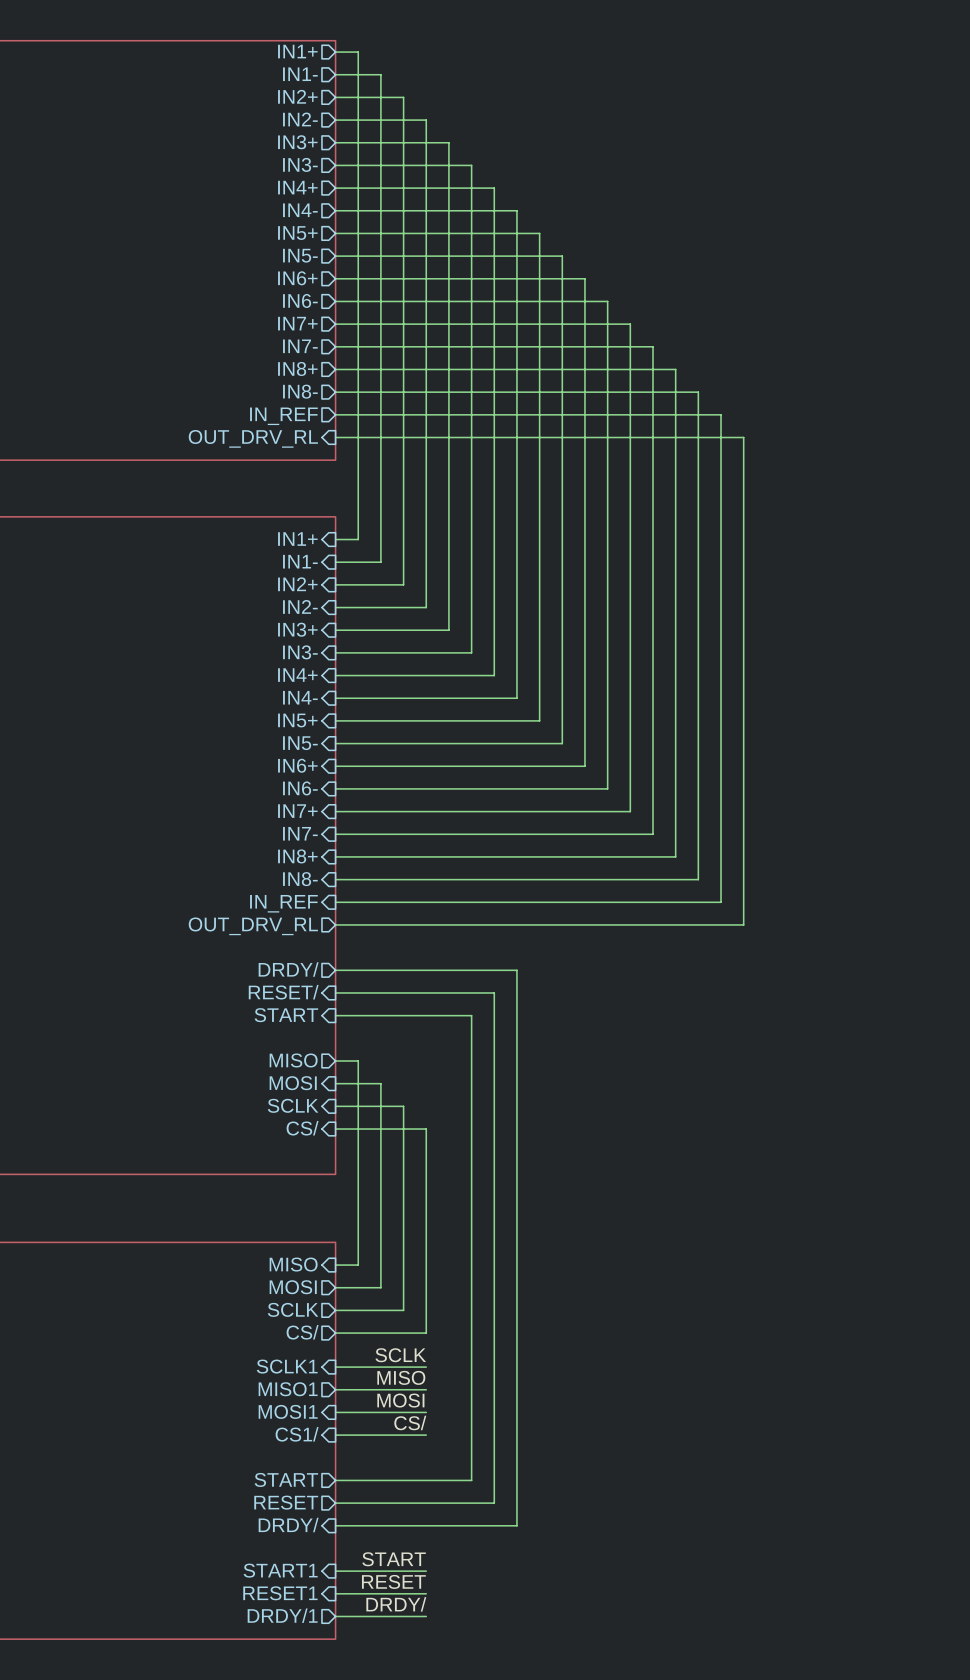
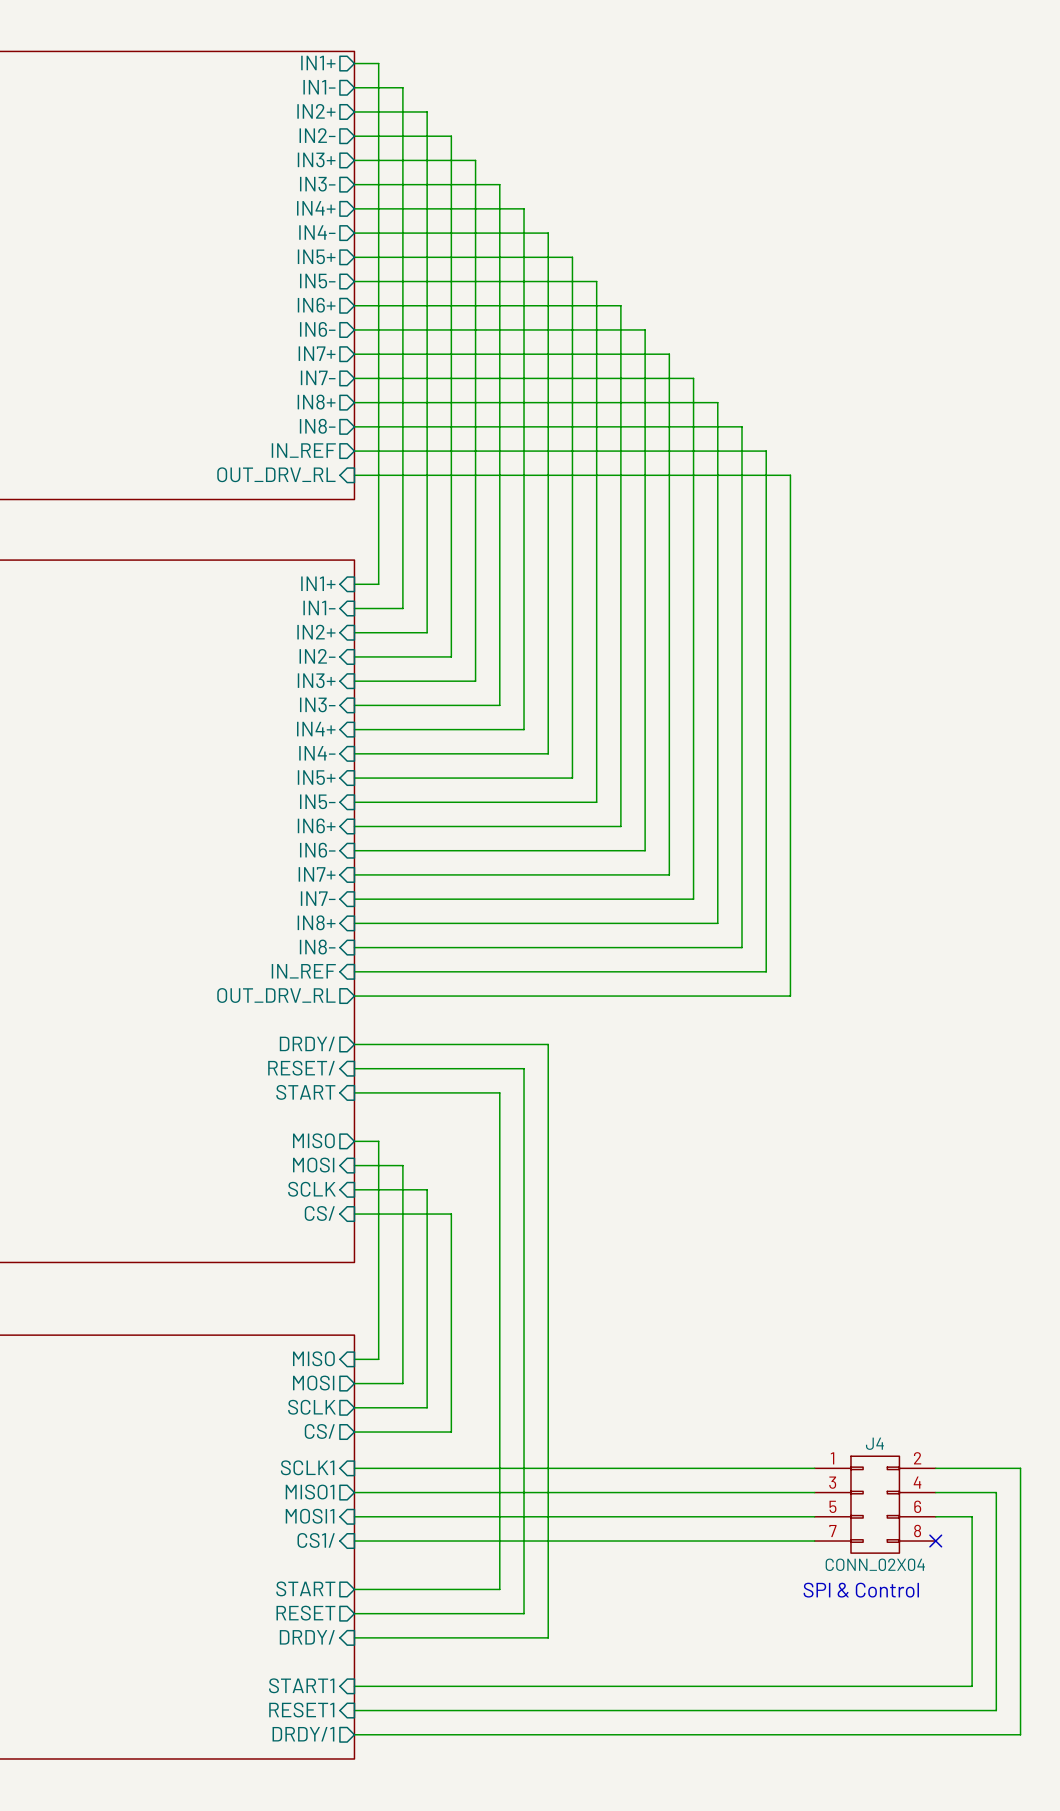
label: SCLK (400, 1355) -> none
wire: none -> (451, 1468) (814, 1468)
wire: none -> (935, 1468) (1020, 1468) (1020, 1734) (451, 1734)
label: MISO (401, 1377) -> none
wire: none -> (451, 1492) (814, 1492)
wire: none -> (935, 1492) (996, 1492) (996, 1710) (451, 1710)
label: MOSI (400, 1400) -> none
J4: none -> CONN_02X04 (875, 1504)
wire: none -> (451, 1516) (814, 1516)
wire: none -> (935, 1516) (972, 1516) (972, 1686) (451, 1686)
label: CS/ (410, 1422) -> none
wire: none -> (451, 1541) (814, 1541)
no-connect mark: none -> (935, 1541)
text: none -> SPI & Control (861, 1590)
label: START (394, 1559) -> none
label: RESET (393, 1581) -> none
label: DRDY/ (396, 1604) -> none

